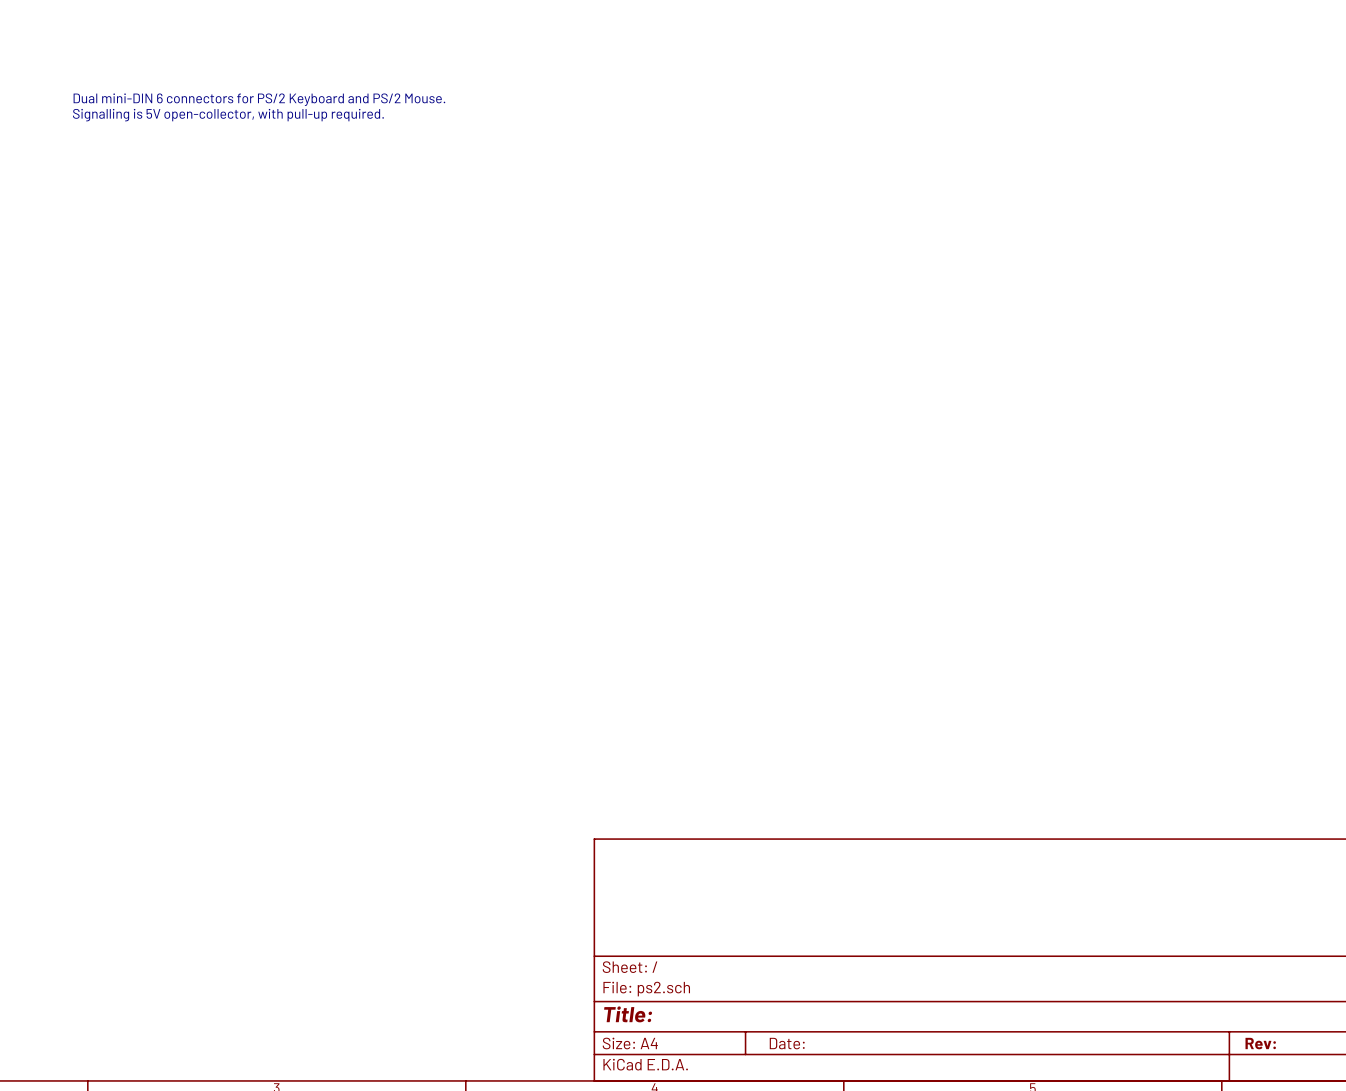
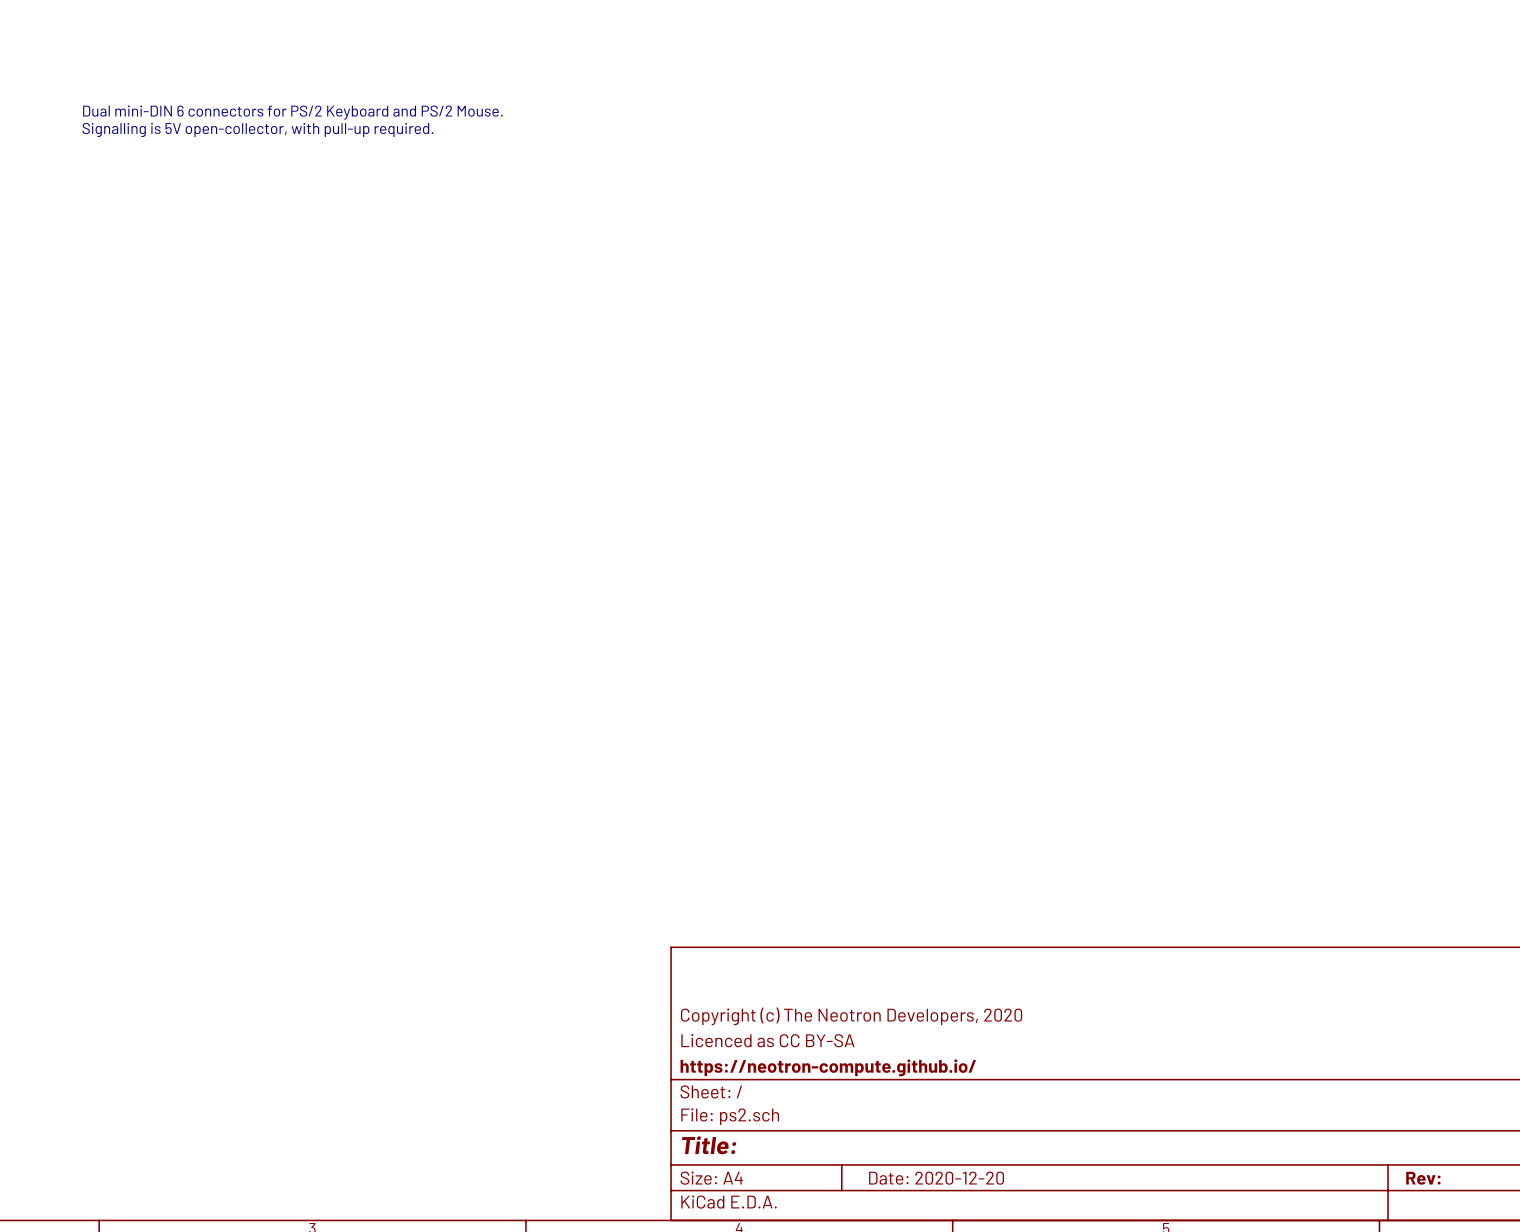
title block: none -> Copyright (c) The Neotron Developers, 2020 (851, 1016)
title block: none -> Licenced as CC BY-SA (767, 1040)
title block: none -> https://neotron-compute.github.io/ (828, 1067)
title block: Date: (787, 1043) -> Date: 2020-12-20 (936, 1178)

